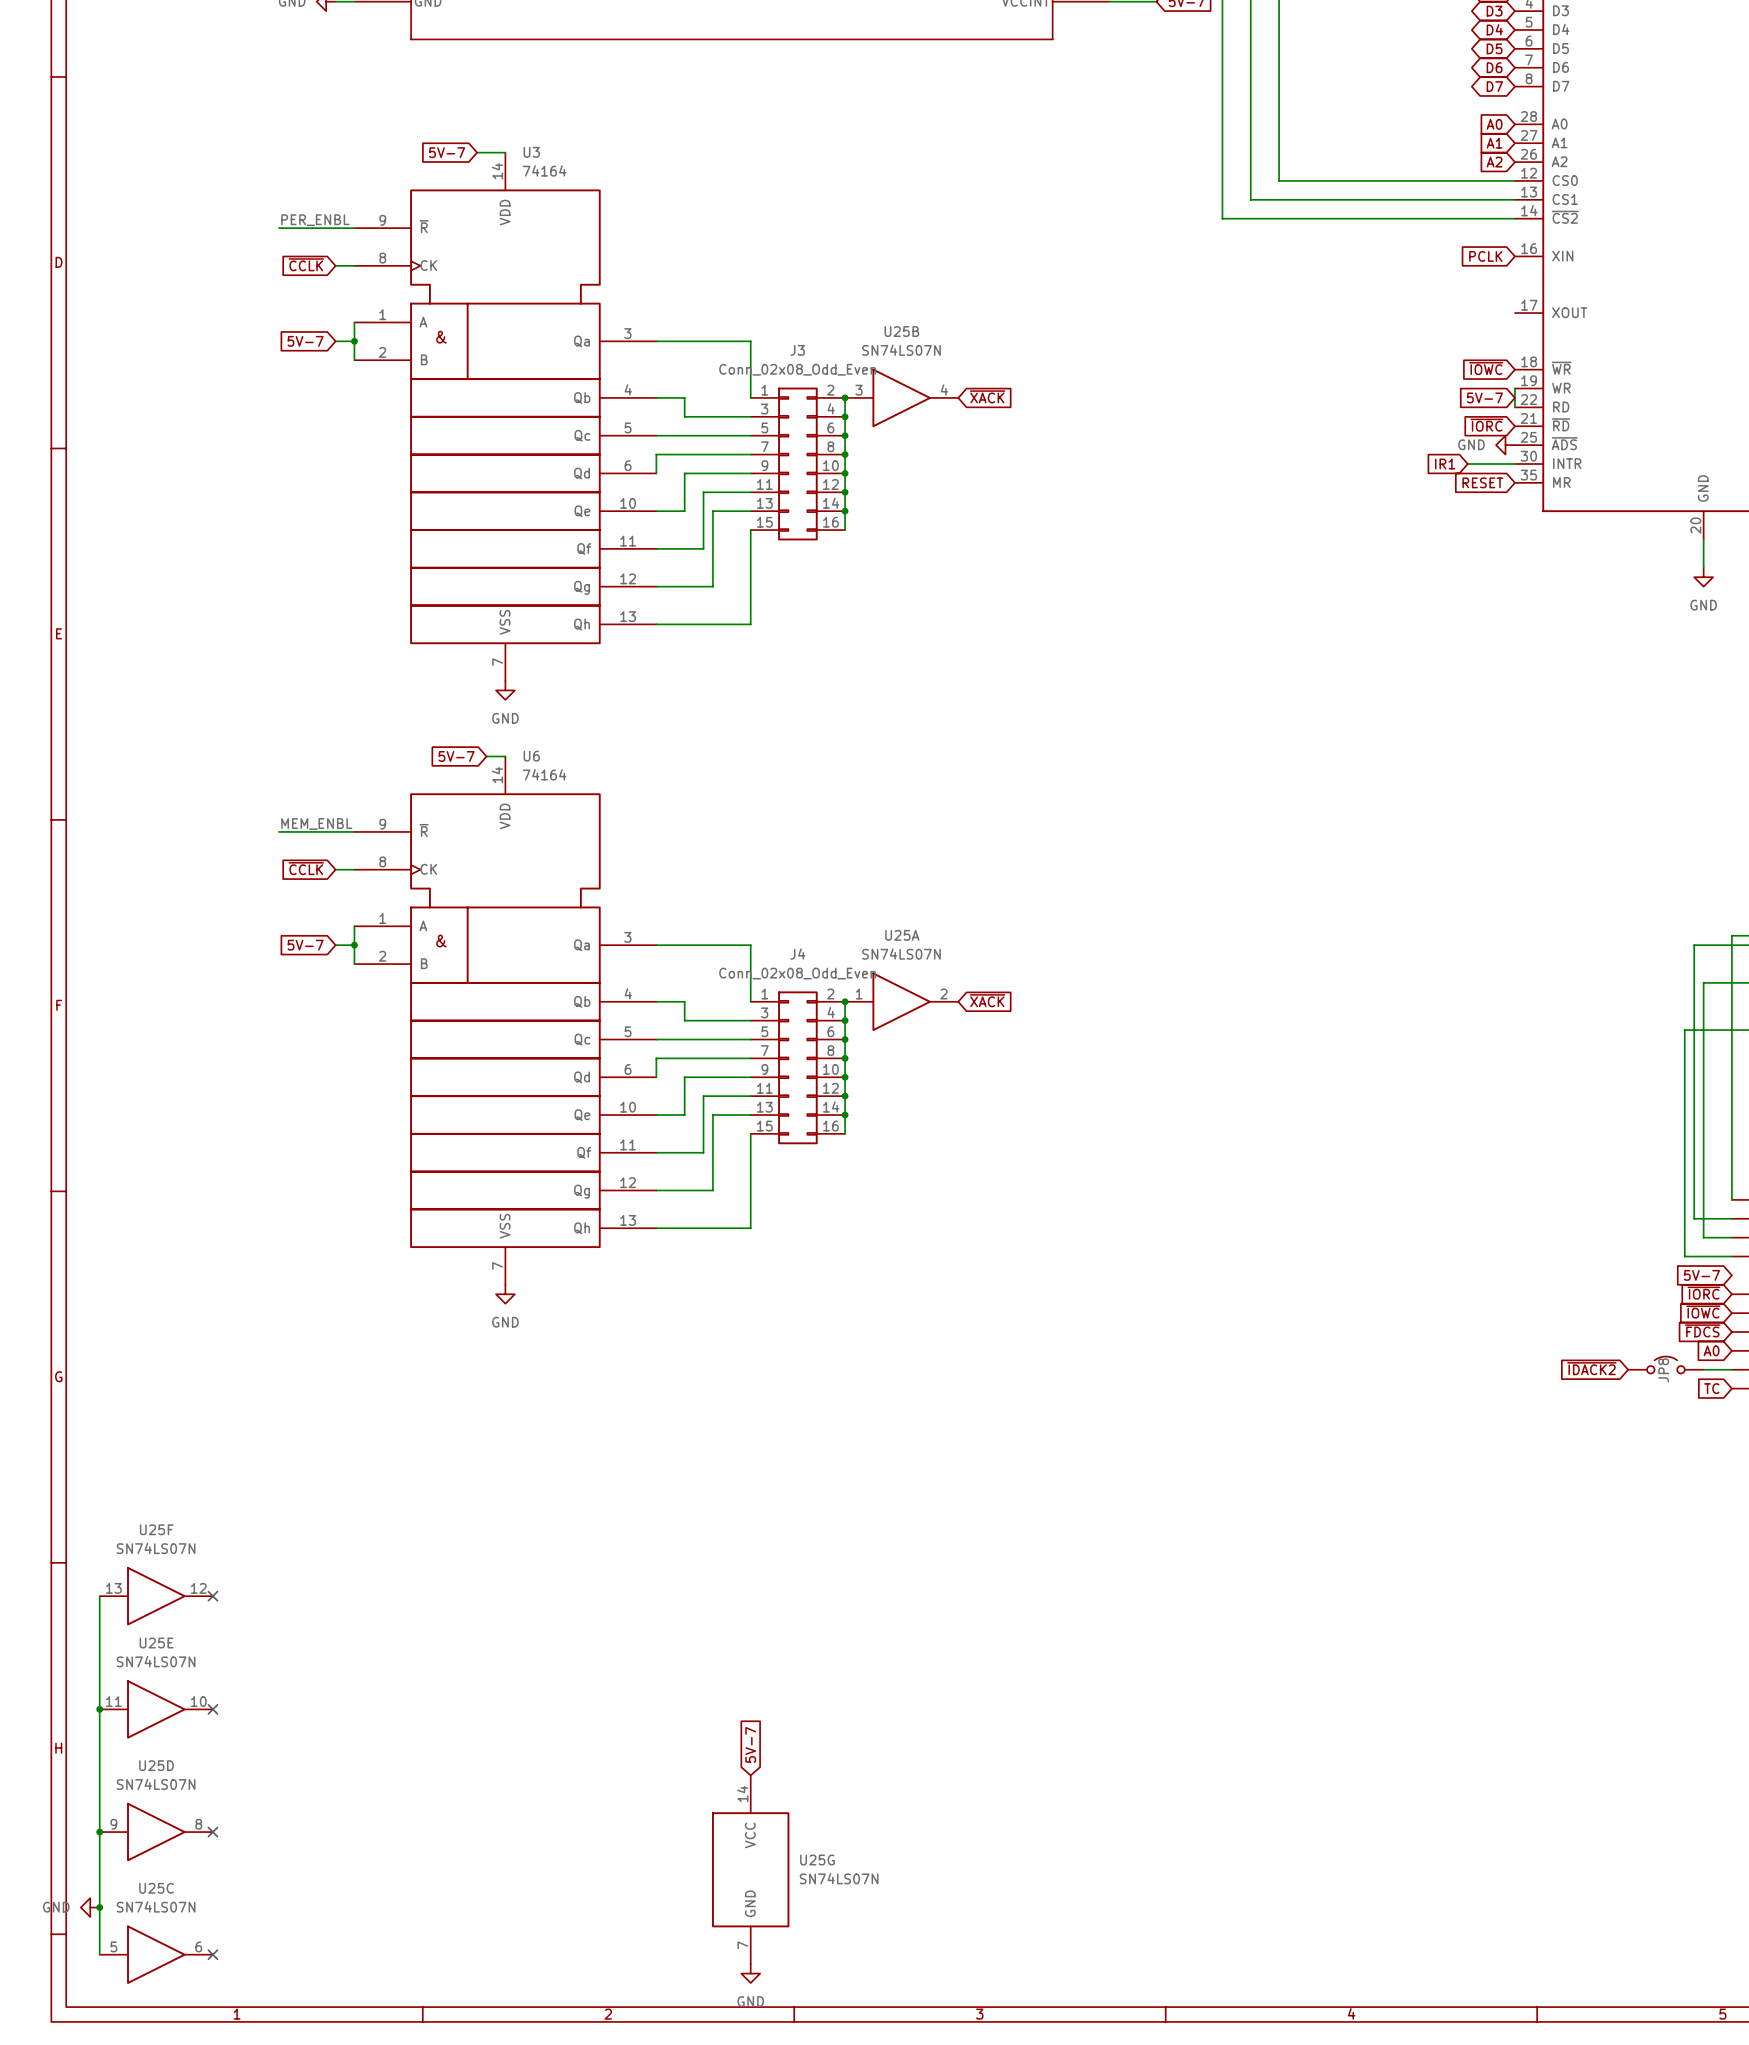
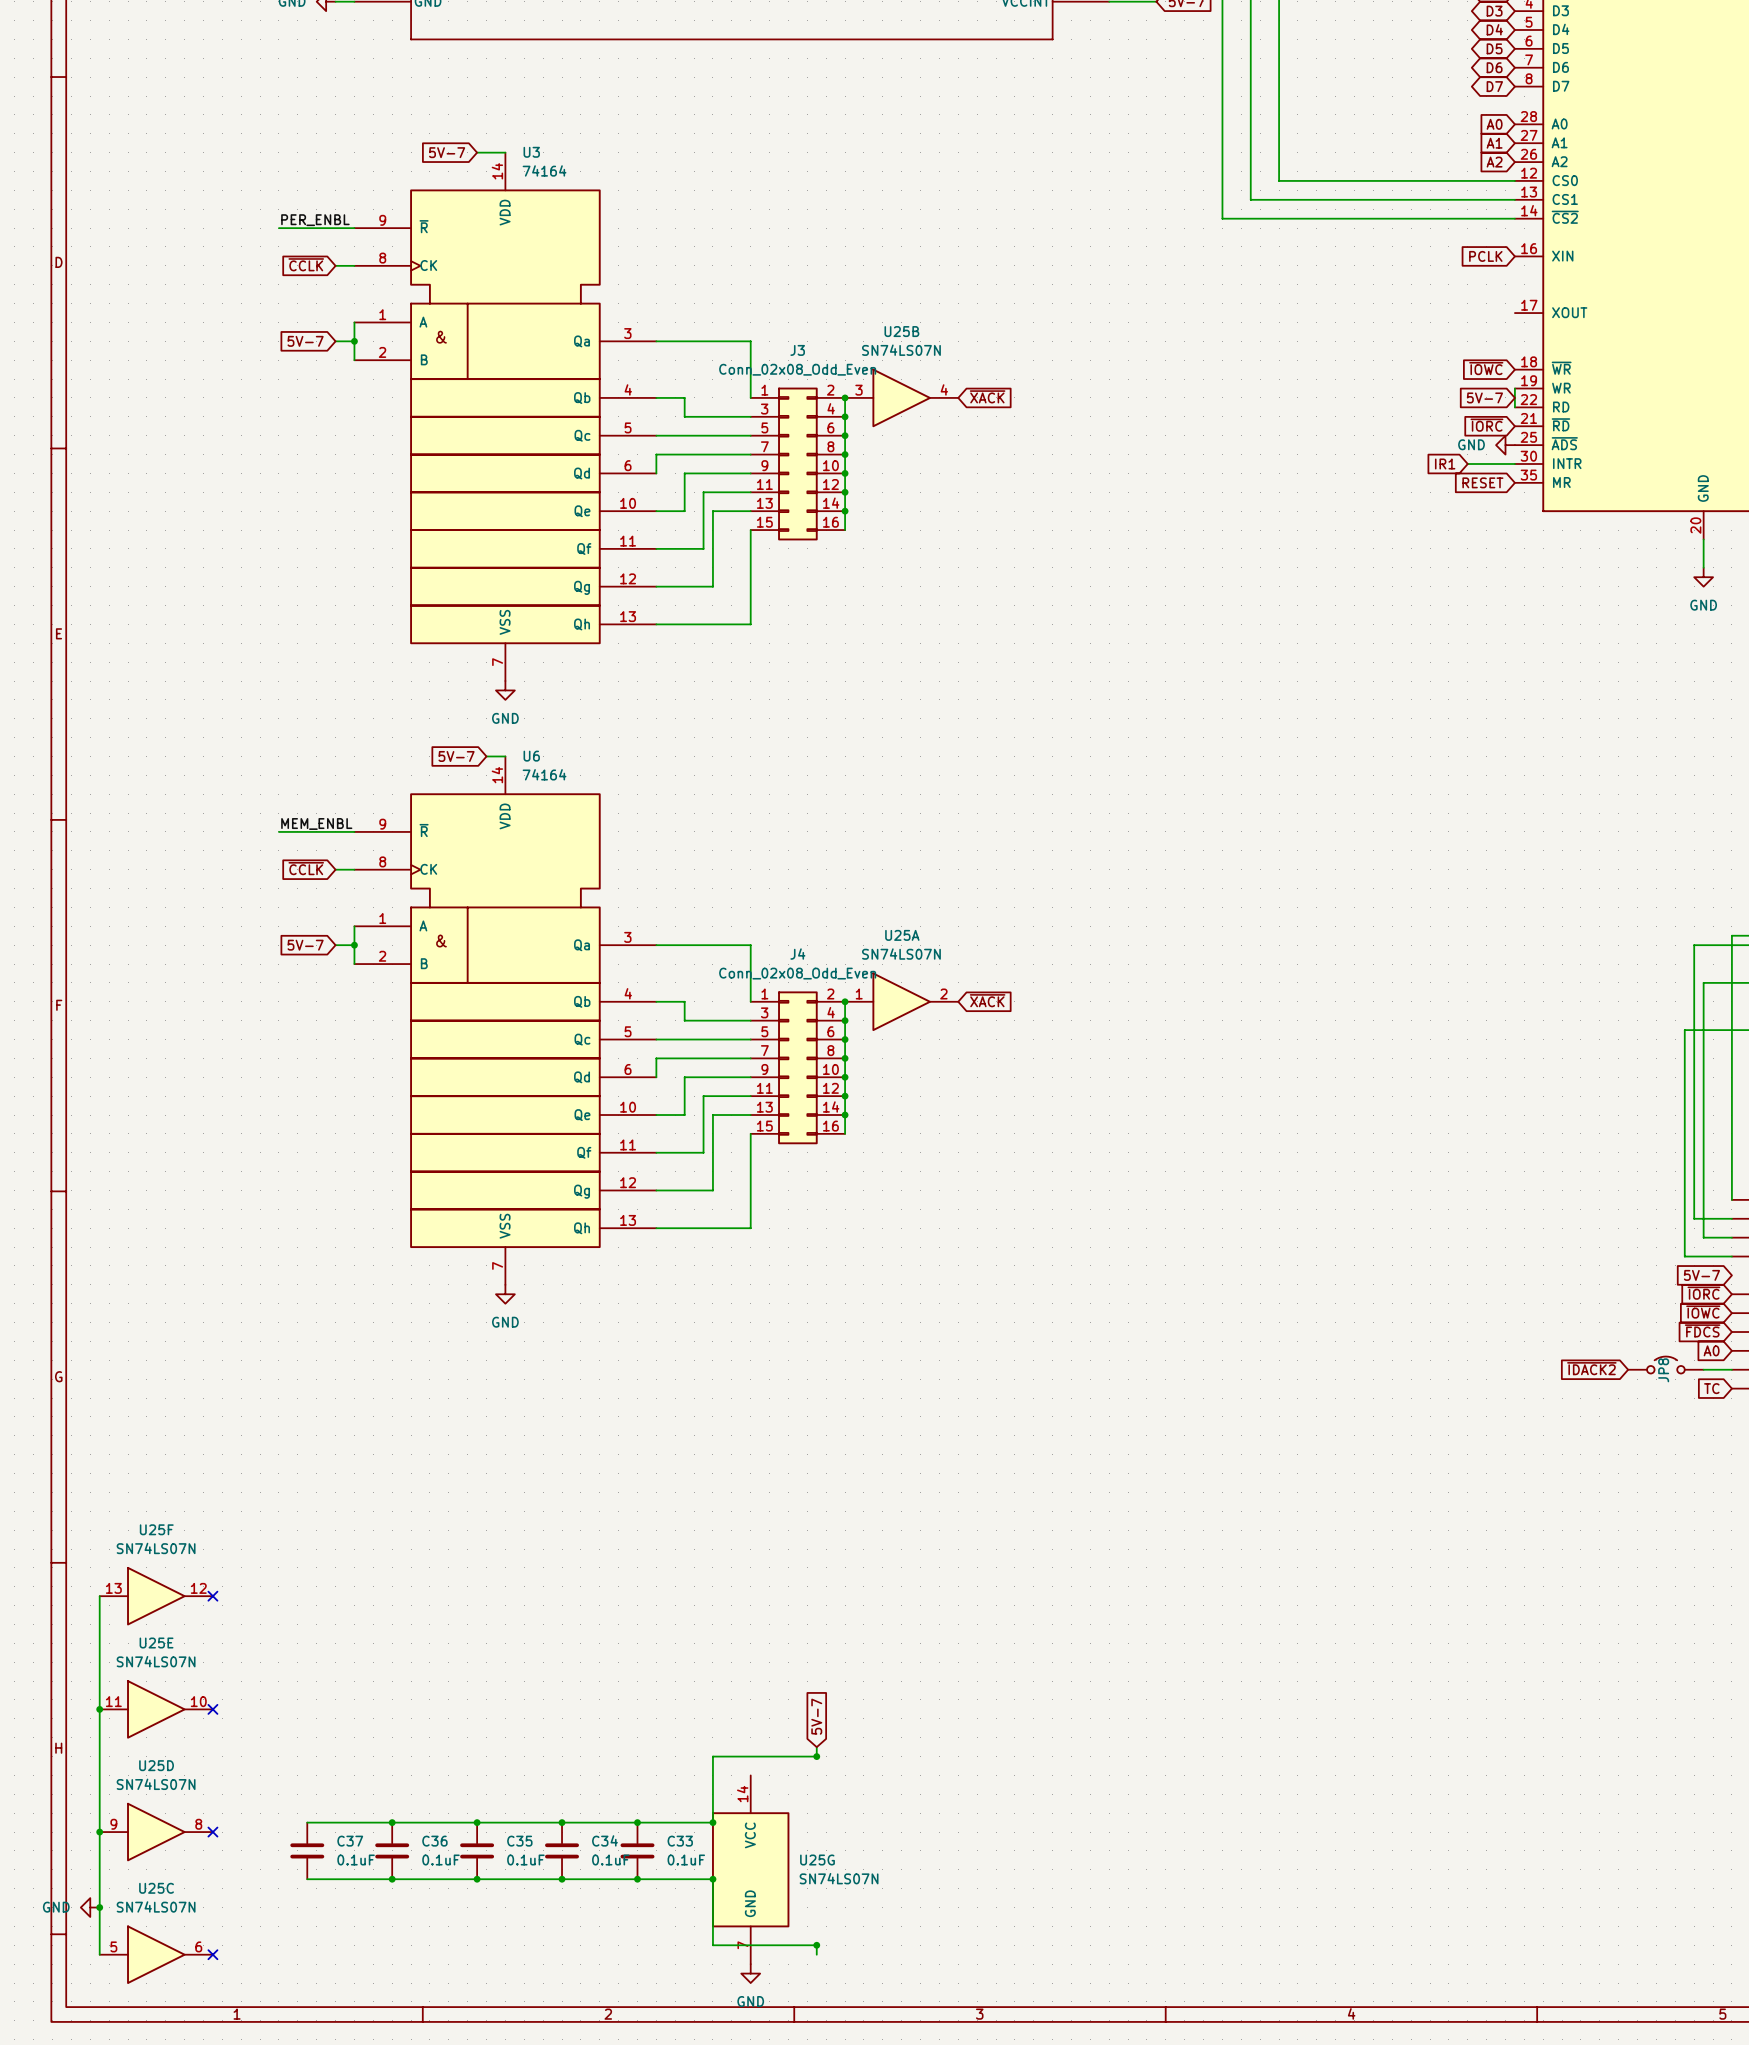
global label position: 5V-7 (750, 1744) -> 5V-7 (816, 1716)
wire: none -> (816, 1747) (816, 1756) (712, 1756) (712, 1822) (307, 1822)
junction: none -> (816, 1756)
junction: none -> (392, 1822)
junction: none -> (477, 1822)
junction: none -> (562, 1822)
junction: none -> (637, 1822)
junction: none -> (712, 1822)
C37: none -> 0.1uF (307, 1850)
C36: none -> 0.1uF (392, 1850)
C35: none -> 0.1uF (477, 1850)
C34: none -> 0.1uF (562, 1850)
C33: none -> 0.1uF (637, 1850)
wire: none -> (307, 1879) (712, 1879) (712, 1945) (816, 1945) (816, 1954)
junction: none -> (392, 1879)
junction: none -> (477, 1879)
junction: none -> (562, 1879)
junction: none -> (637, 1879)
junction: none -> (712, 1879)
junction: none -> (816, 1945)

